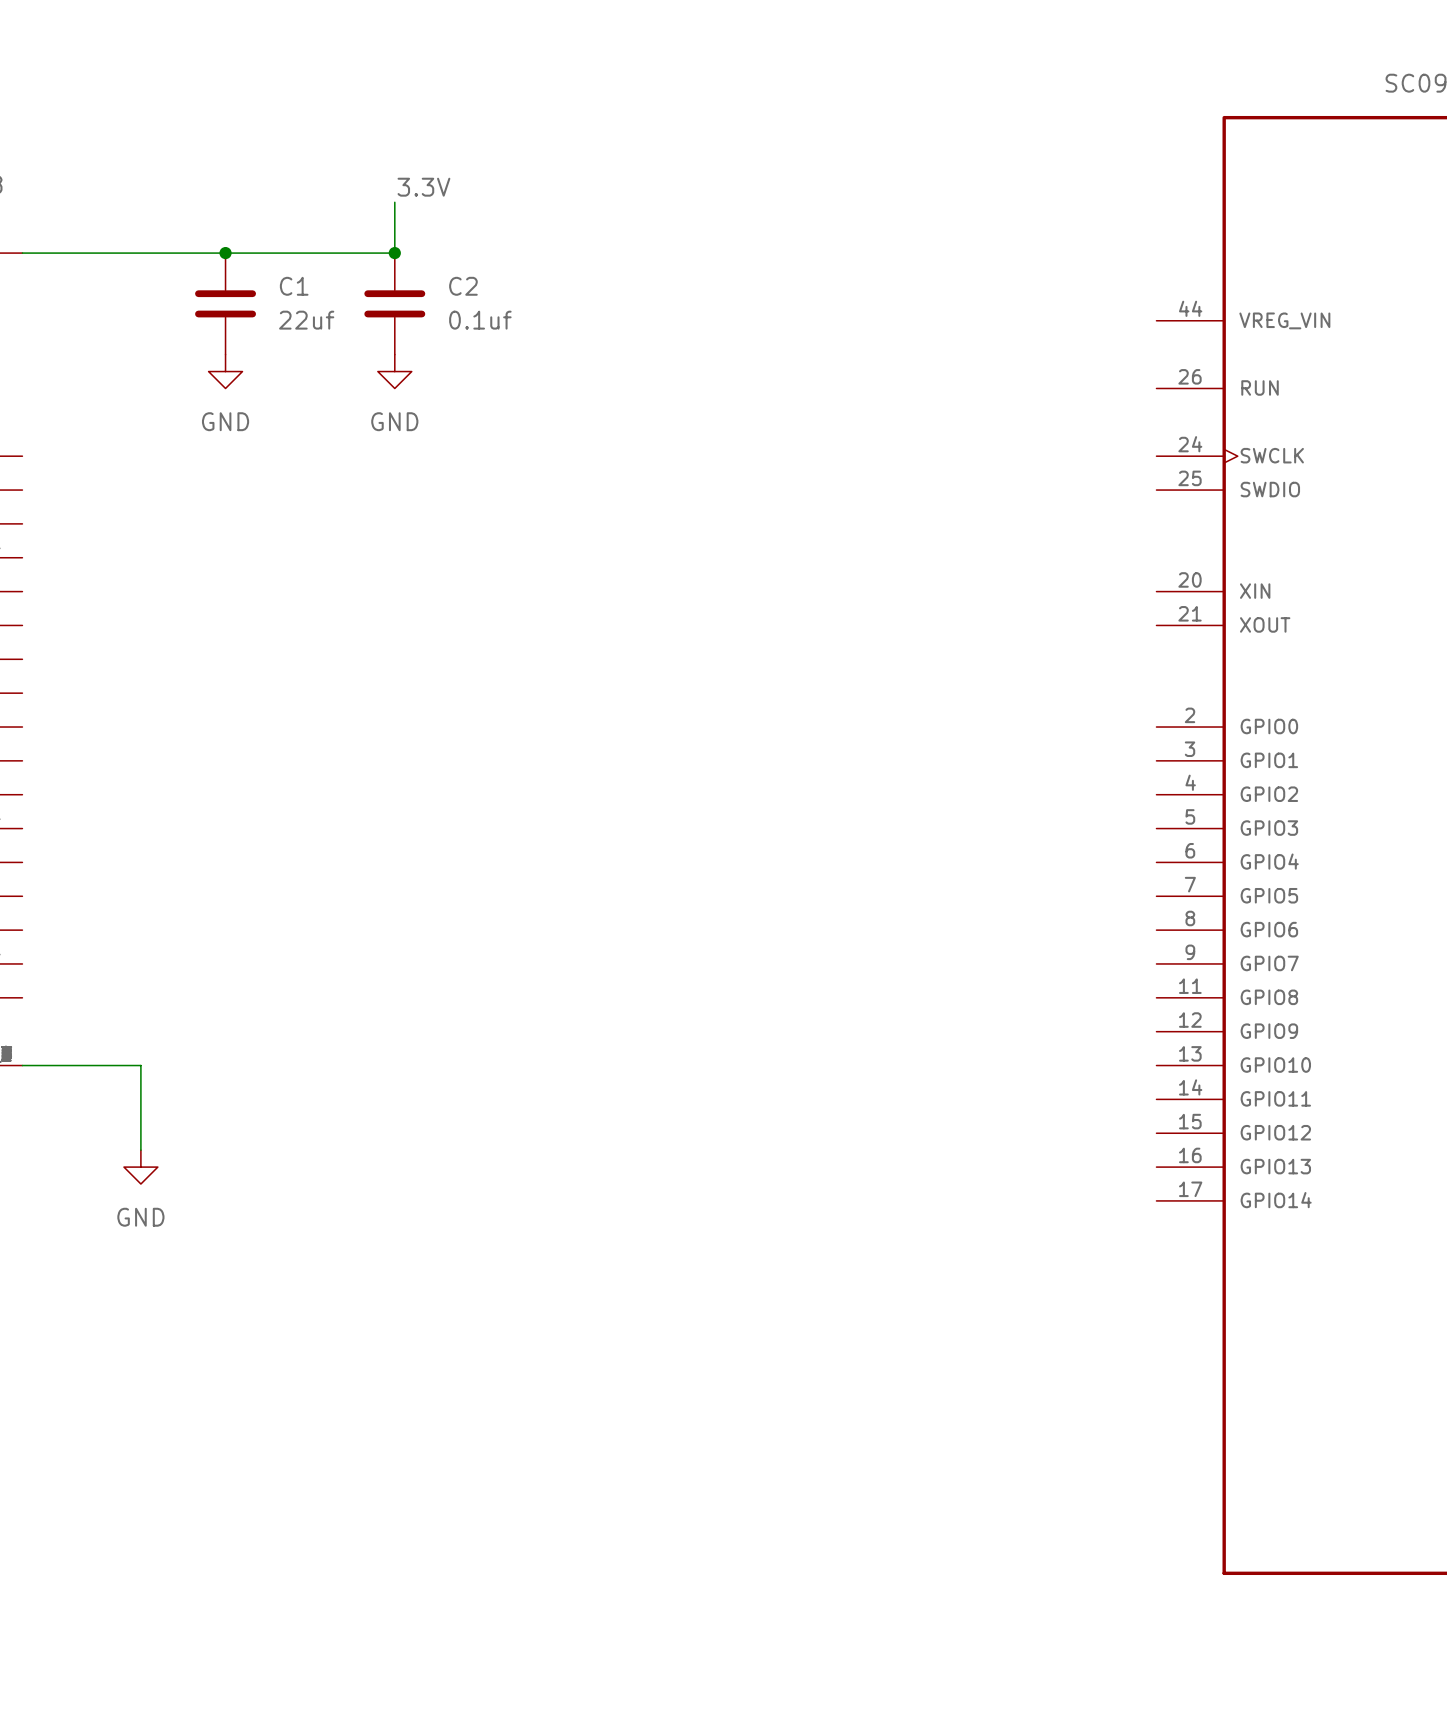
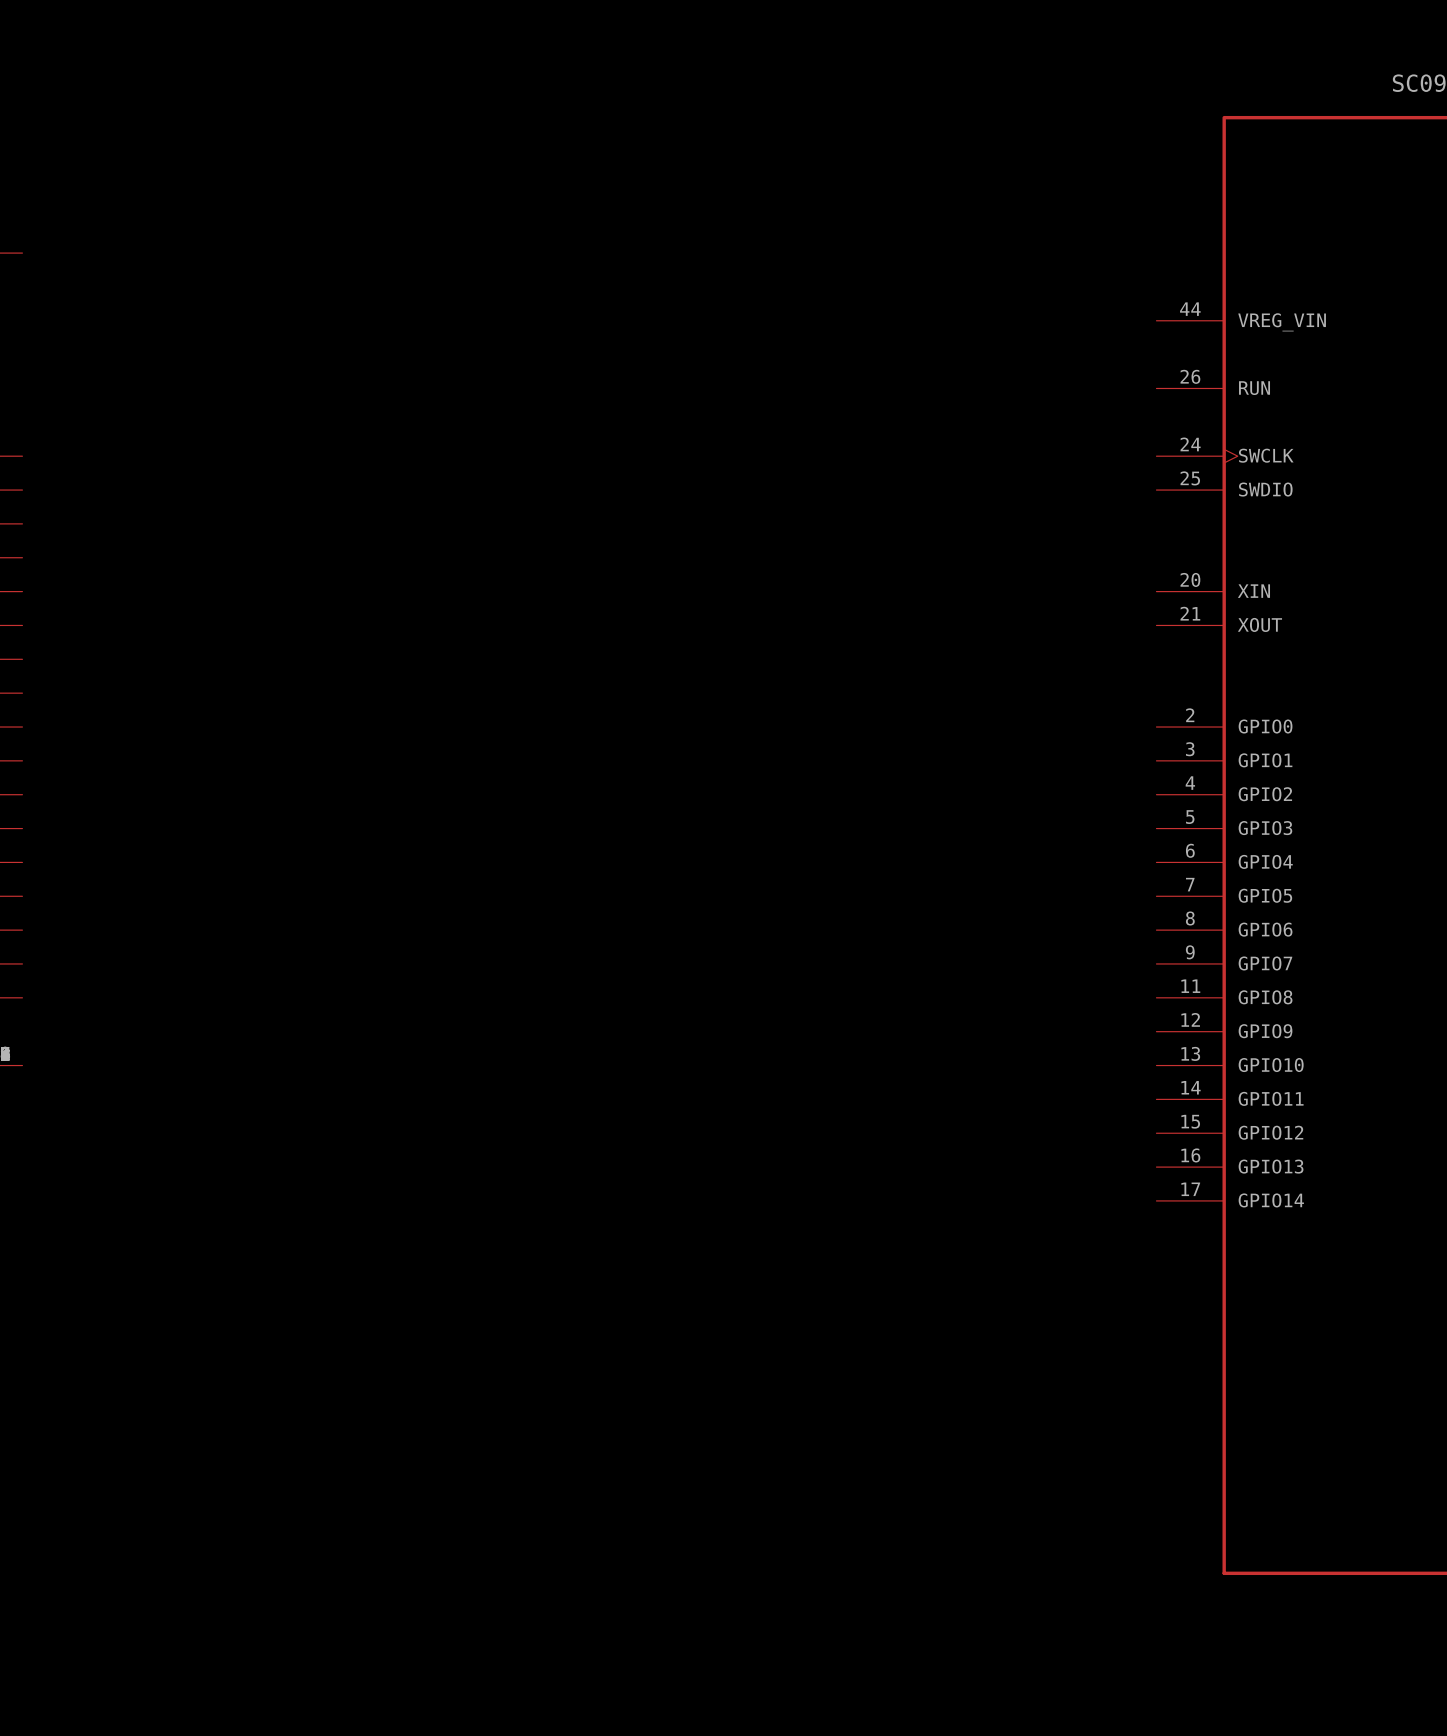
label: 3.3V (423, 187) -> none
wire: (394, 202) (394, 253) (22, 253) -> none
junction: (225, 253) -> none
junction: (394, 253) -> none
C1: 22uf (225, 303) -> none
C2: 0.1uf (394, 303) -> none
power symbol: GND (225, 371) -> none
power symbol: GND (394, 371) -> none
wire: (22, 1065) (140, 1065) (140, 1150) -> none
power symbol: GND (140, 1167) -> none

